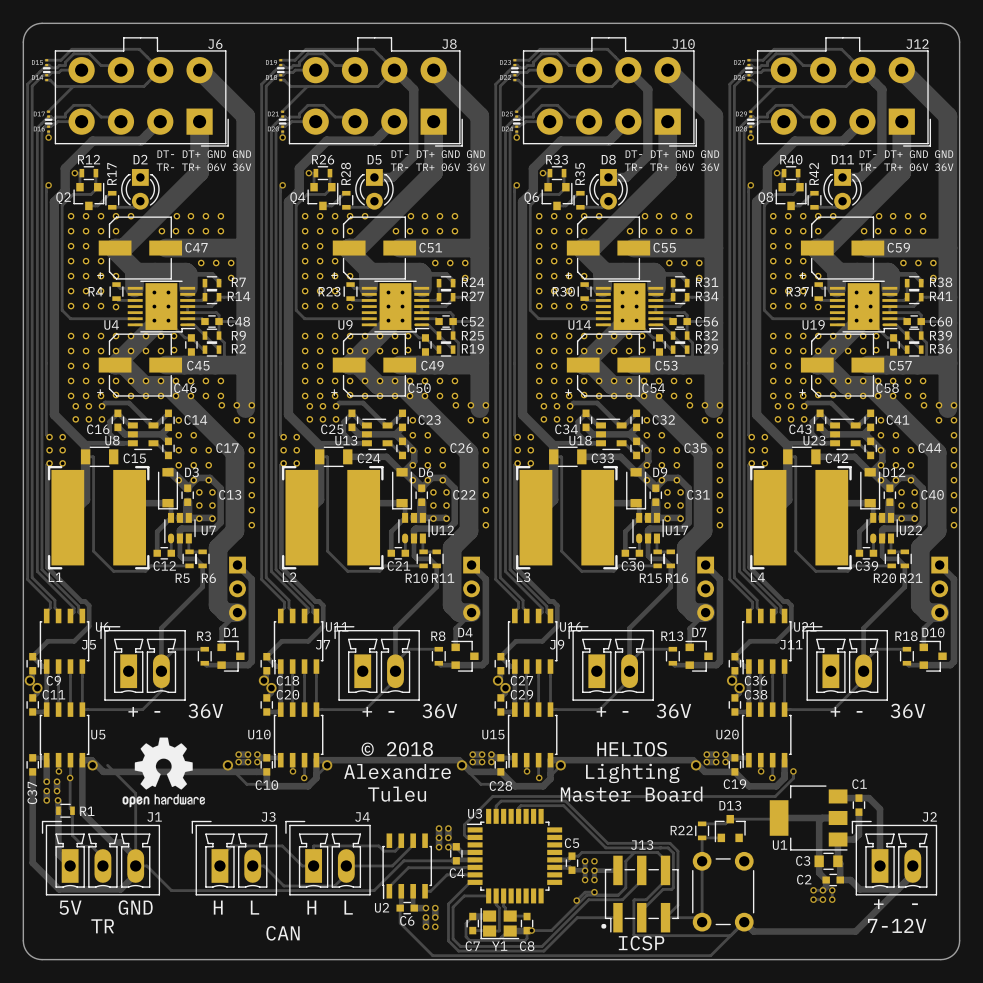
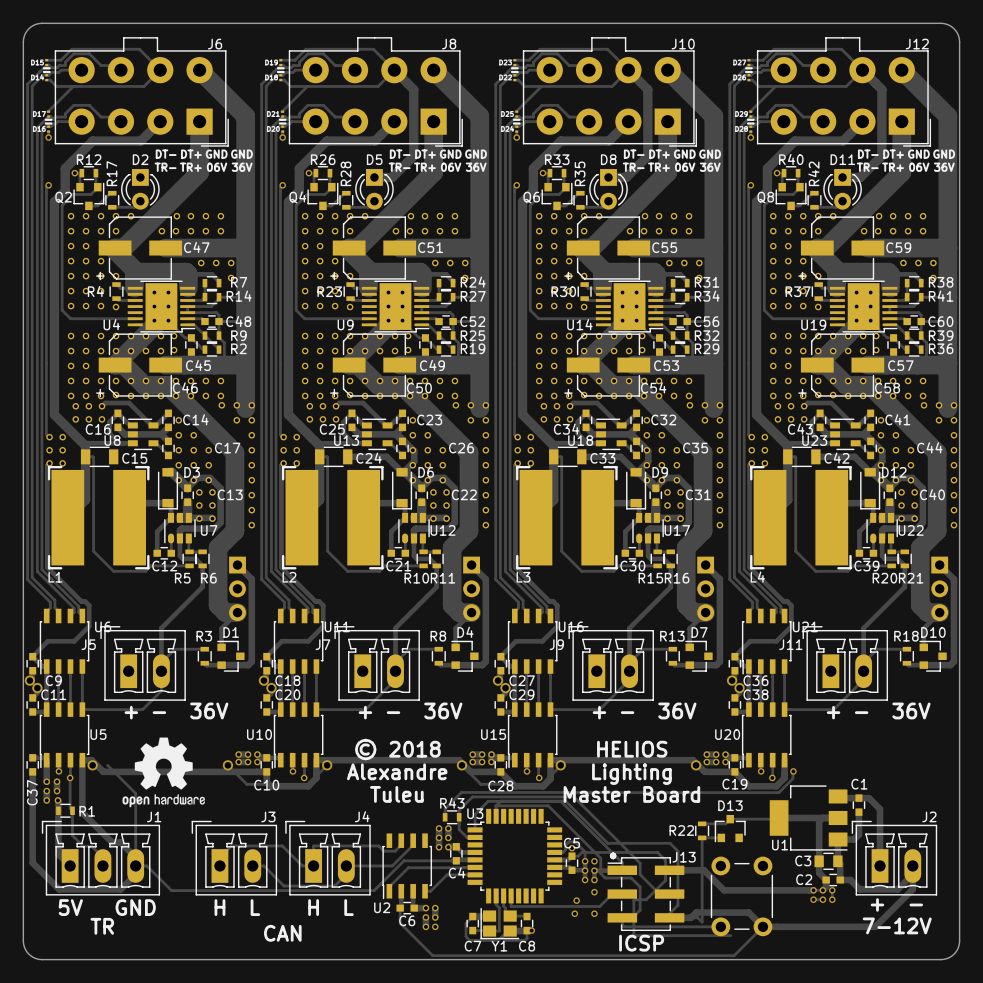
track: none -> (792, 771) (792, 778) (778, 792) (461, 792) (445, 808) (445, 817)
track: (793, 771) (793, 778) (775, 796) (492, 796) (464, 824) (464, 835) (467, 837) -> (669, 894) (659, 894) (640, 874) (640, 863) (573, 796) (472, 796) (459, 810) (459, 829) (467, 837)
track: (518, 816) (518, 808) (520, 805) (563, 805) (605, 847) (668, 847) (673, 853) (673, 887) (663, 889) (641, 910) (641, 917) -> none
R43: none -> (452, 817)
track: none -> (475, 829) (475, 814) (488, 801) (560, 801) (622, 862) (622, 870)
J13 name position: J13 (642, 845) -> J13 (684, 857)
via: none -> (571, 848)
track: none -> (554, 852) (563, 852) (568, 841) (575, 841) (585, 851) (585, 861)
track: (634, 852) (625, 861) (625, 887) (618, 895) (586, 895) (551, 930) (527, 930) -> none
track: (641, 870) (641, 880) (622, 899) (588, 899) (542, 946) (460, 946) (453, 939) (453, 907) (464, 895) (488, 895) -> none
track: none -> (669, 870) (704, 870) (724, 890) (813, 890)
track: none -> (912, 874) (912, 889) (875, 926) (762, 926)
track: (475, 882) (470, 882) (448, 904) (448, 940) (458, 951) (543, 951) (577, 917) (617, 917) -> (496, 806) (548, 805) (600, 858) (600, 873) (605, 878) (631, 878) (640, 886) (640, 910) (632, 917) (617, 917)
track: (897, 889) (855, 931) (753, 931) (744, 922) (710, 955) -> (762, 926) (734, 955) (710, 955)
part position: (723, 891) -> (741, 896)
track: none -> (622, 894) (612, 894) (599, 906) (511, 906) (511, 895)
J13 rotation: 0° (641, 894) -> 90° clockwise (645, 894)
track: (597, 895) (594, 892) (585, 892) (576, 900) -> none
via: none -> (574, 913)
via: none -> (594, 913)
track: none -> (622, 917) (623, 926) (720, 926)
track: none -> (669, 917) (690, 917) (696, 912) (748, 912) (762, 926)
text position: • (603, 926) -> • (613, 855)

